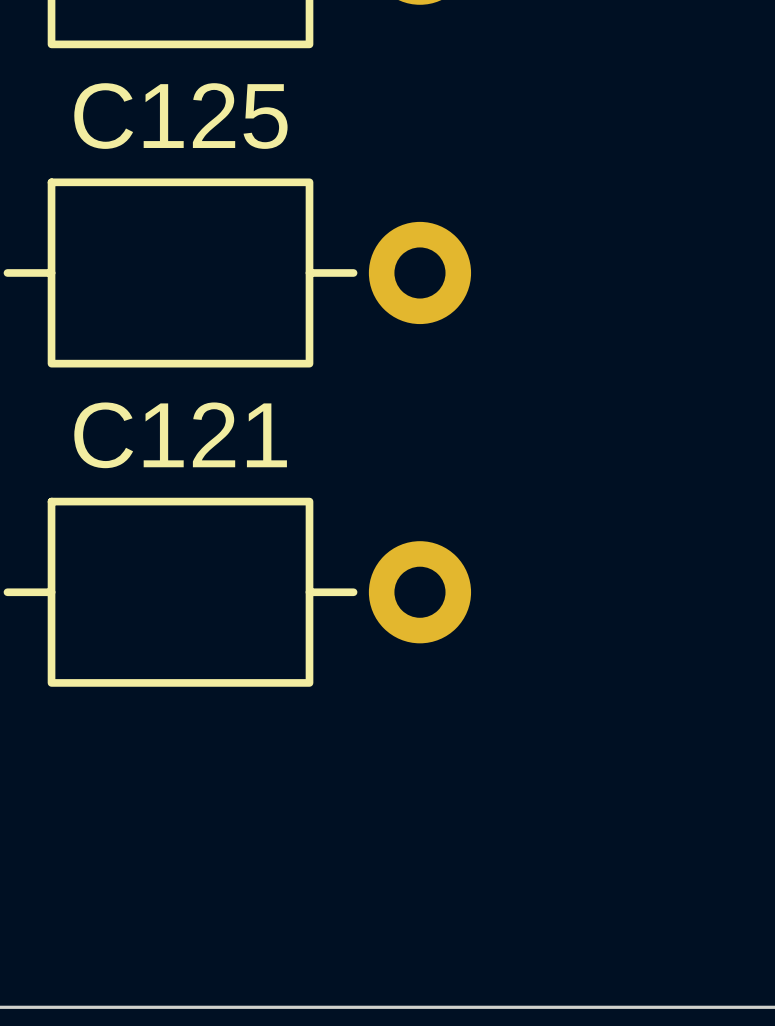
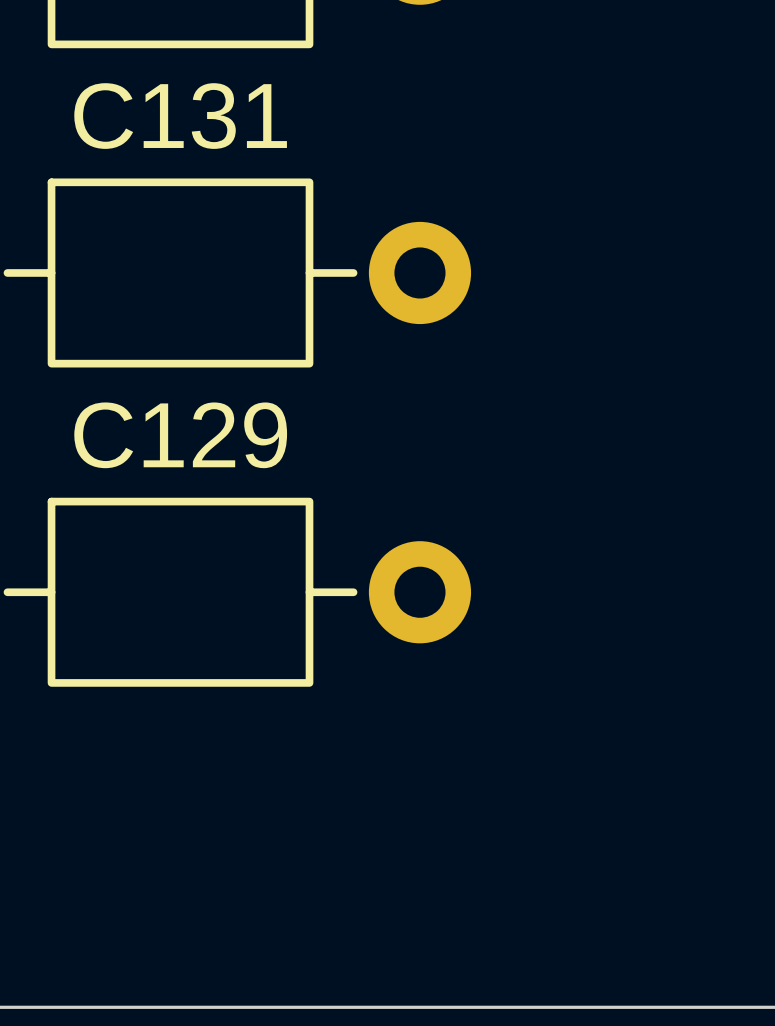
C125 name: C125 (180, 116) -> C131 (180, 116)
C121 name: C121 (180, 435) -> C129 (180, 435)

